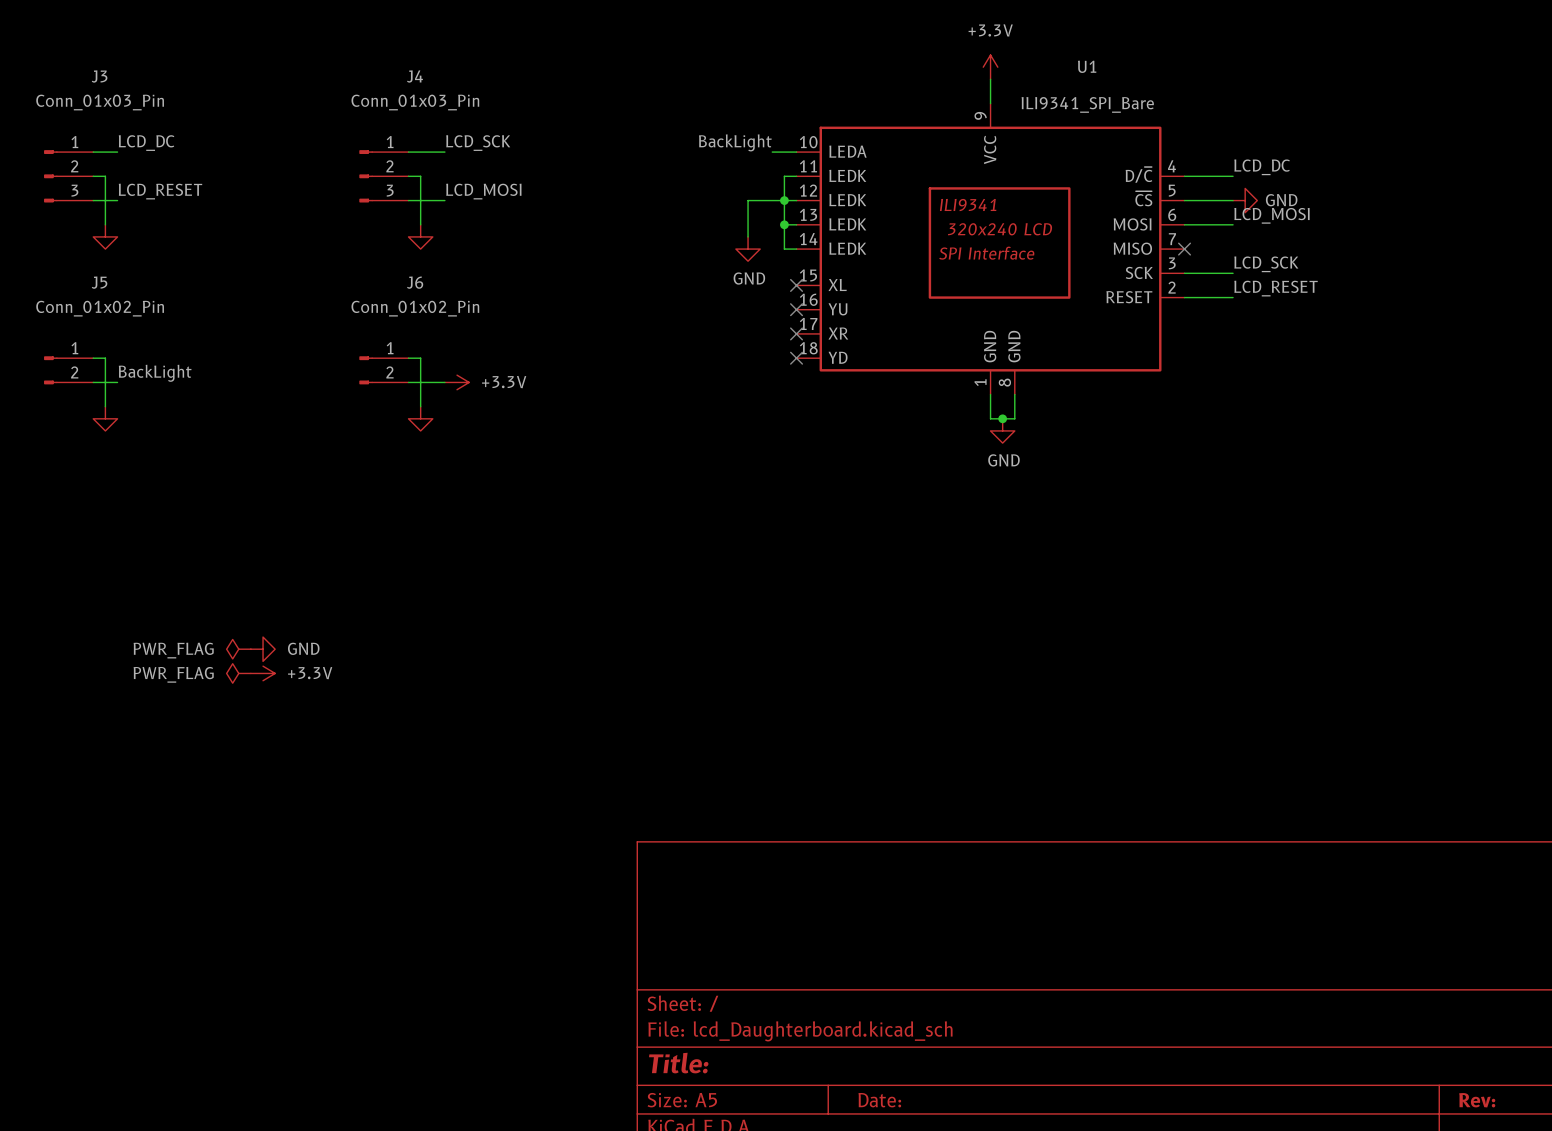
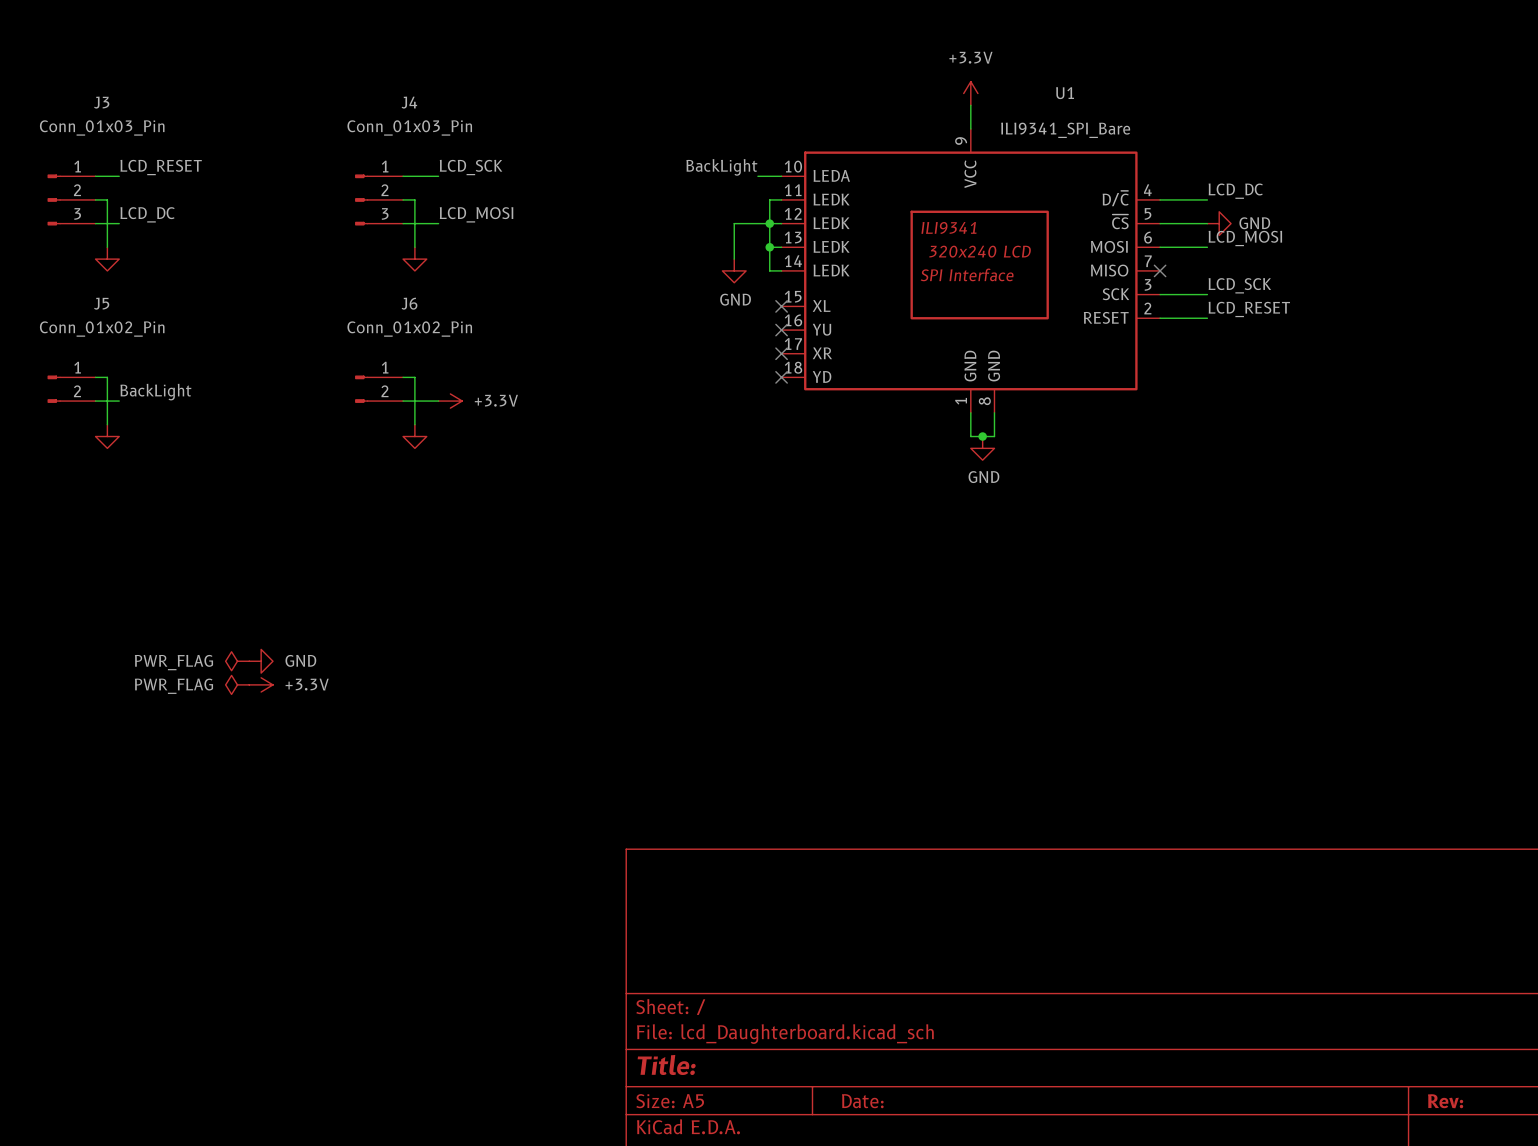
label: LCD_DC (146, 143) -> LCD_RESET (161, 167)
label: LCD_RESET (160, 191) -> LCD_DC (147, 214)

